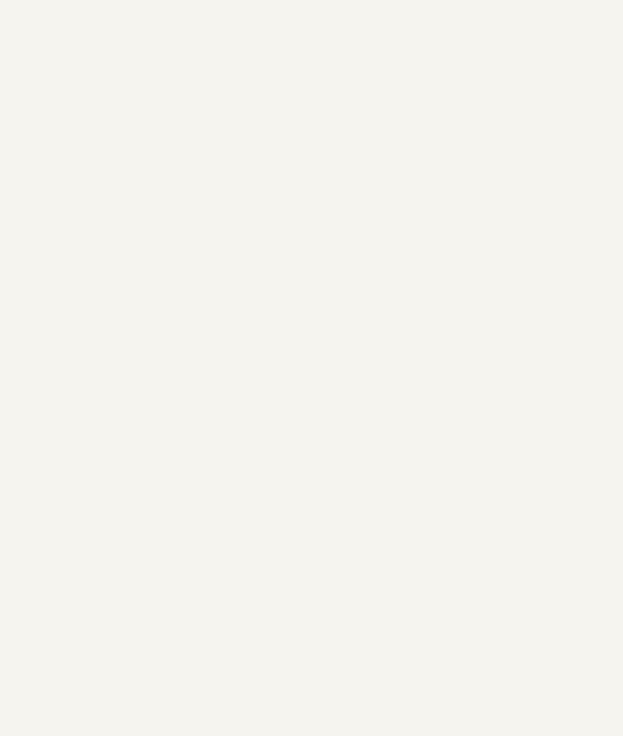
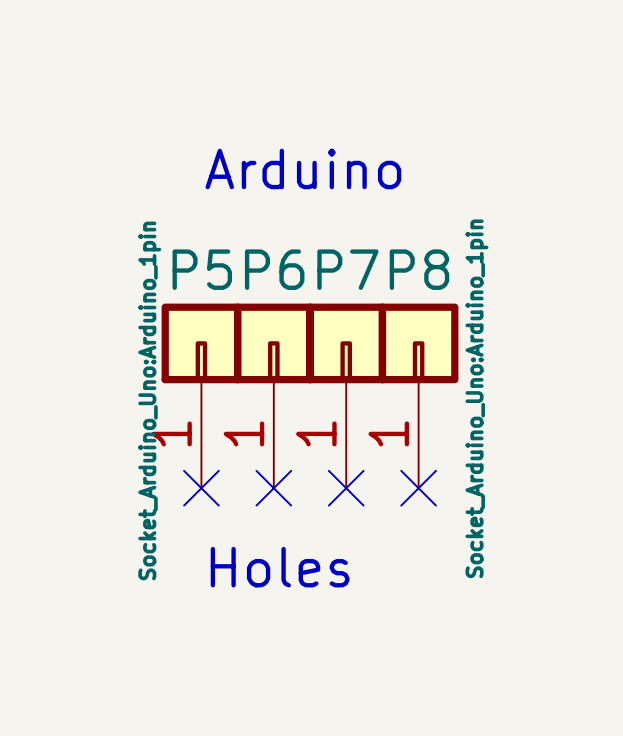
text: none -> Arduino (303, 168)
P5: none -> (201, 395)
P6: none -> (273, 395)
P7: none -> (346, 395)
P8: none -> (418, 395)
no-connect mark: none -> (201, 488)
no-connect mark: none -> (273, 488)
no-connect mark: none -> (346, 488)
no-connect mark: none -> (418, 488)
text: none -> Holes (280, 567)

